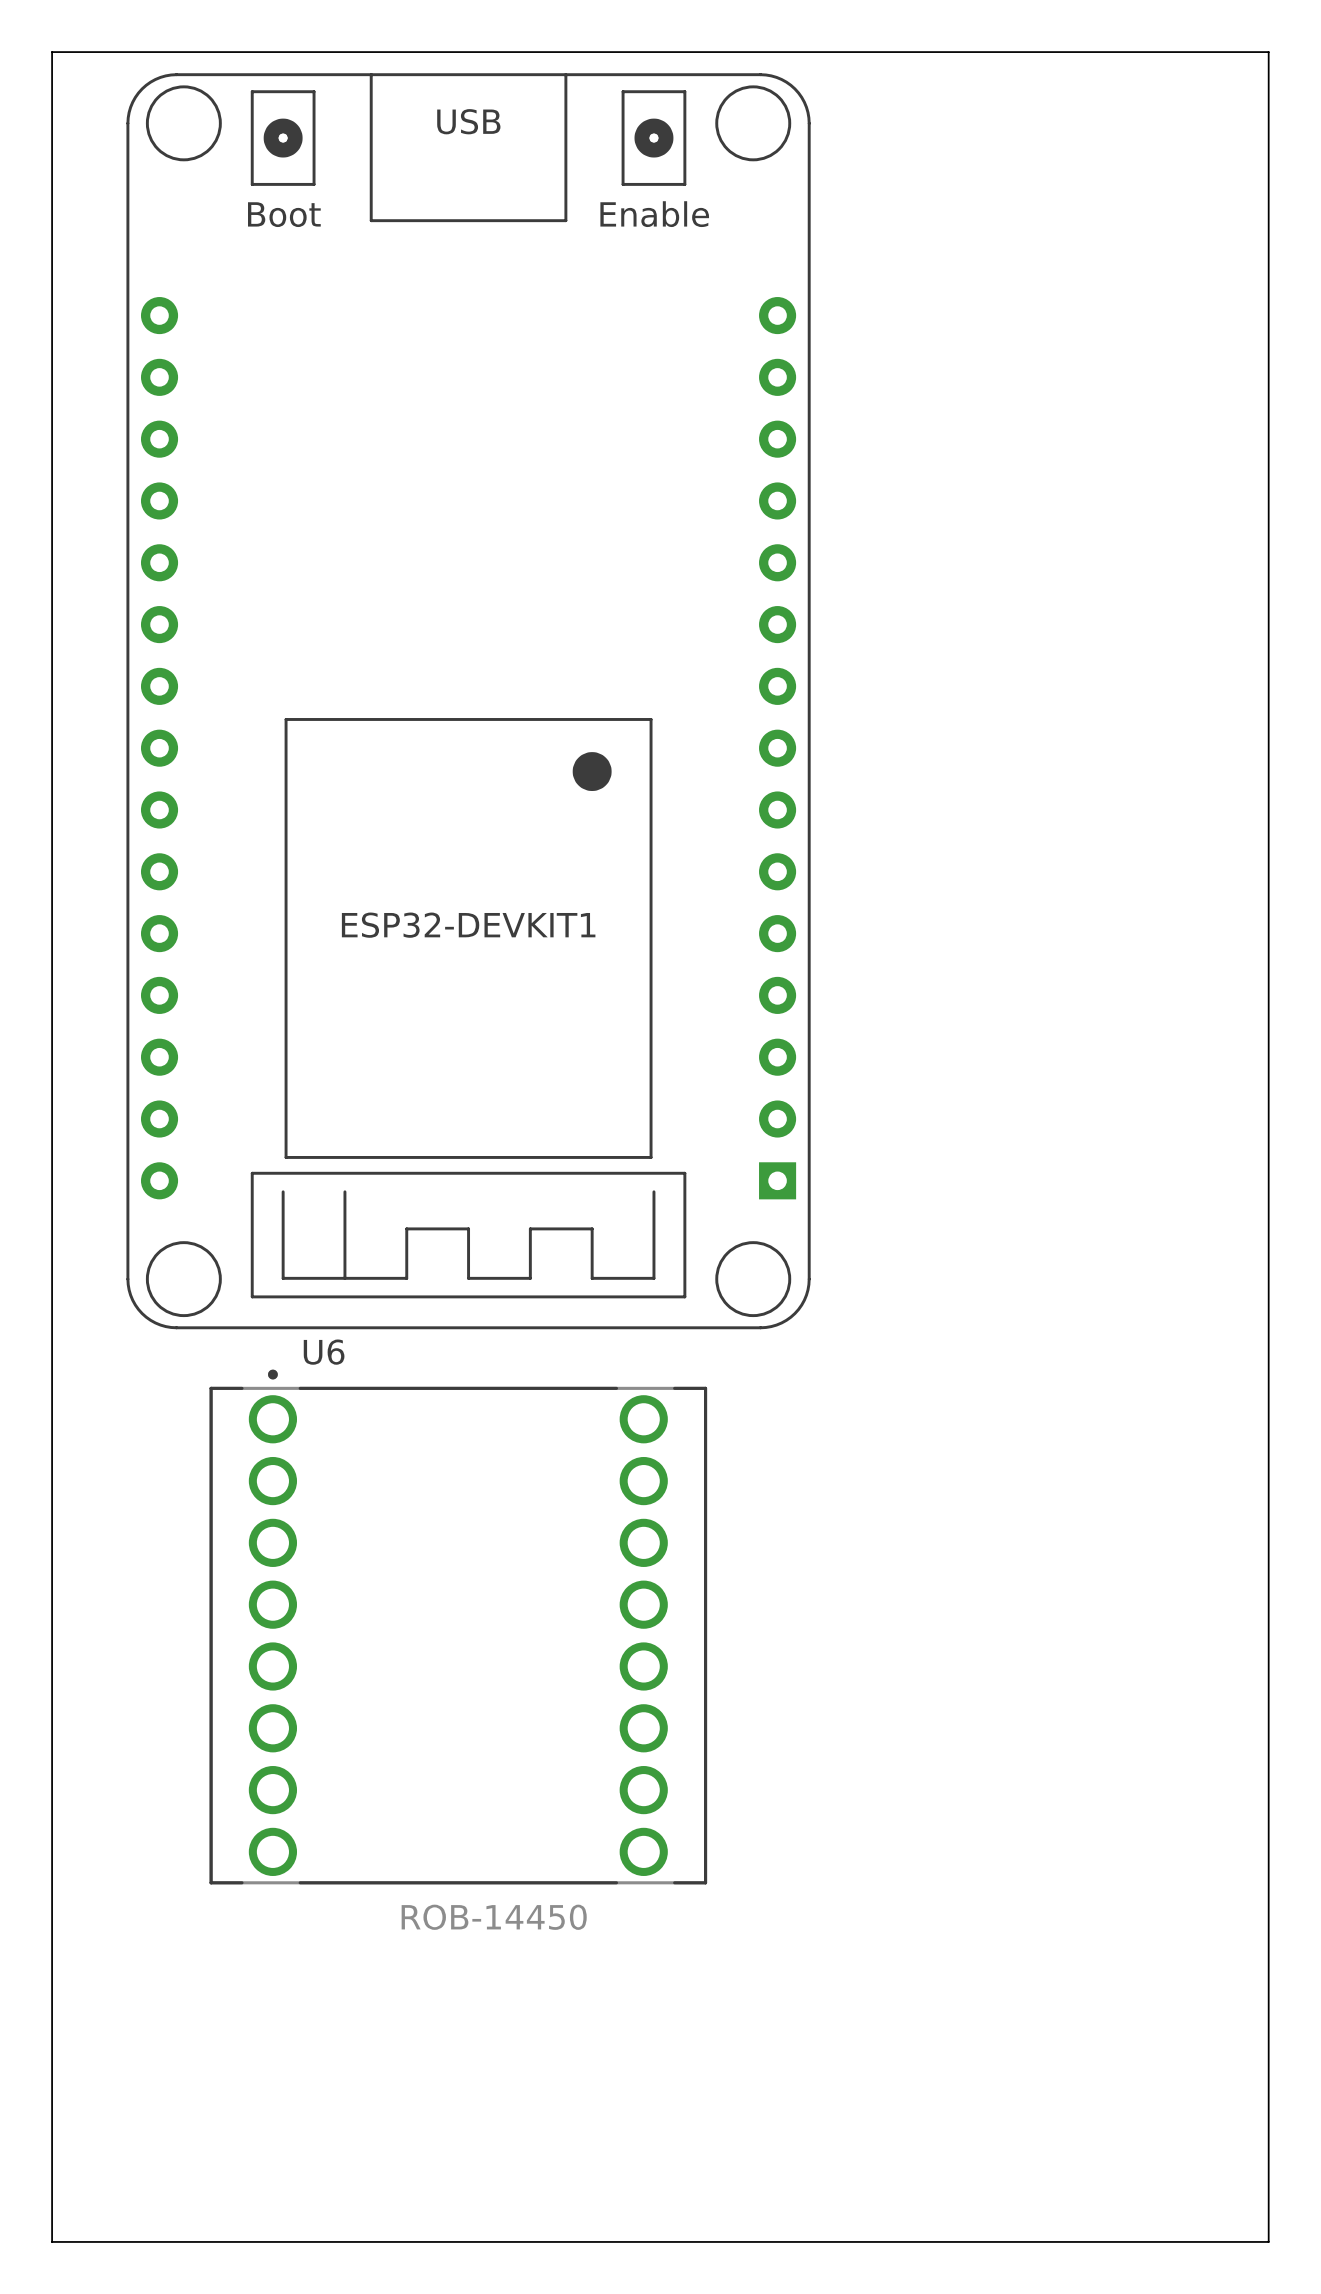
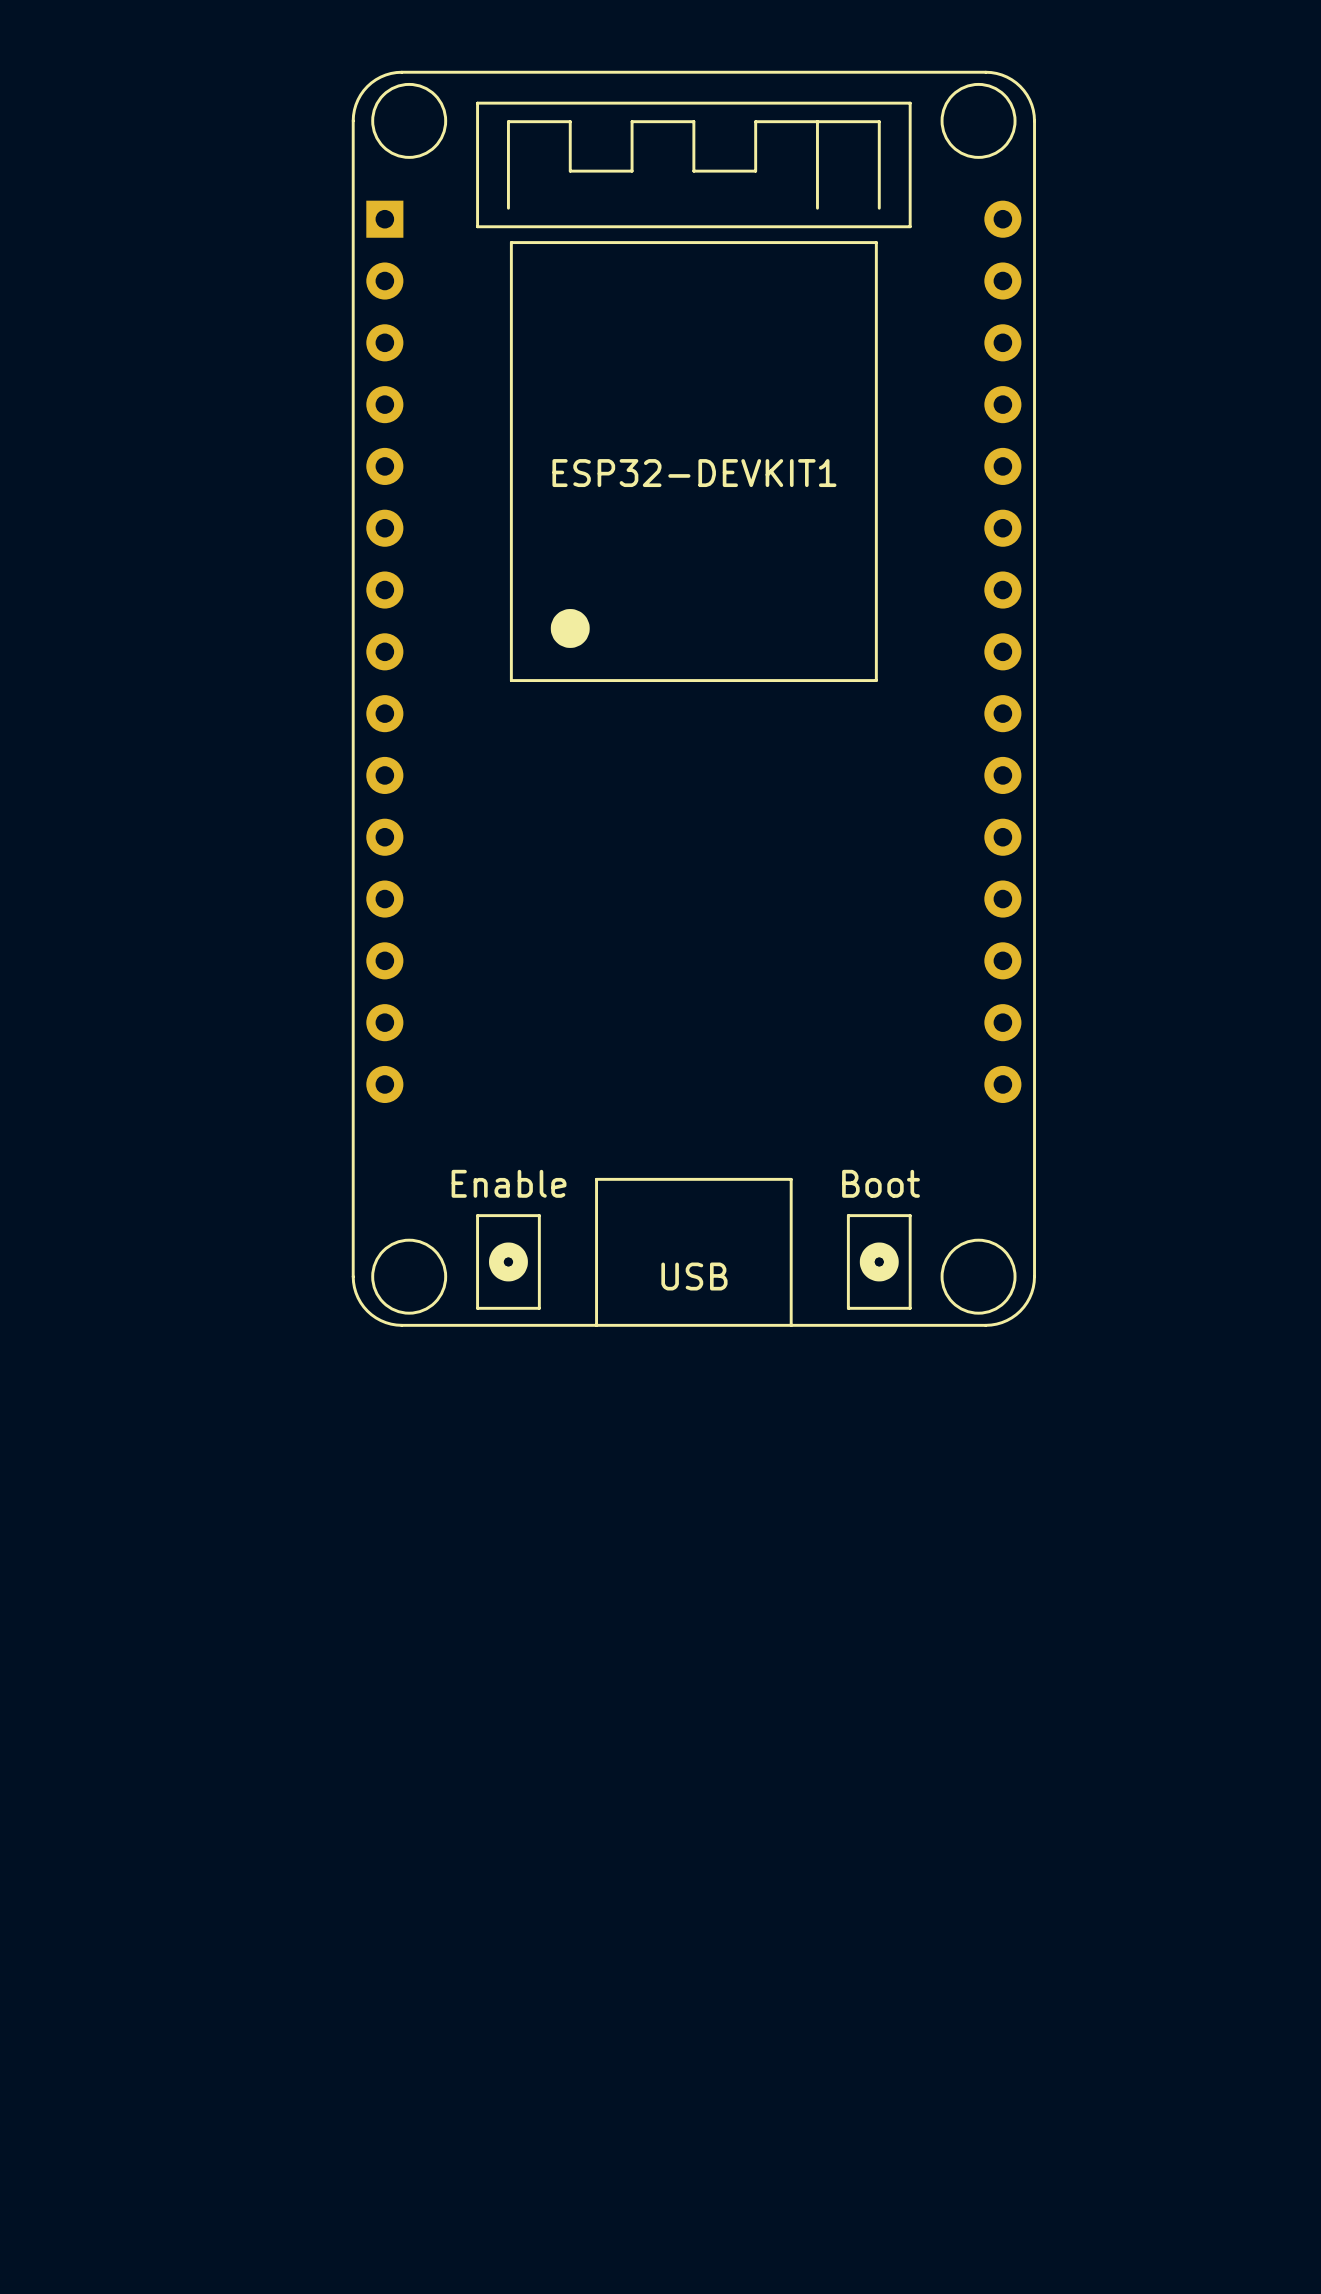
board edge: (52, 52) (1268, 52) (1268, 2241) (52, 2241) (52, 52) -> none
ESP32-DEVKIT1 rotation: 0° (468, 701) -> 180° (693, 698)
U6: ROB-14450 (458, 1627) -> none

